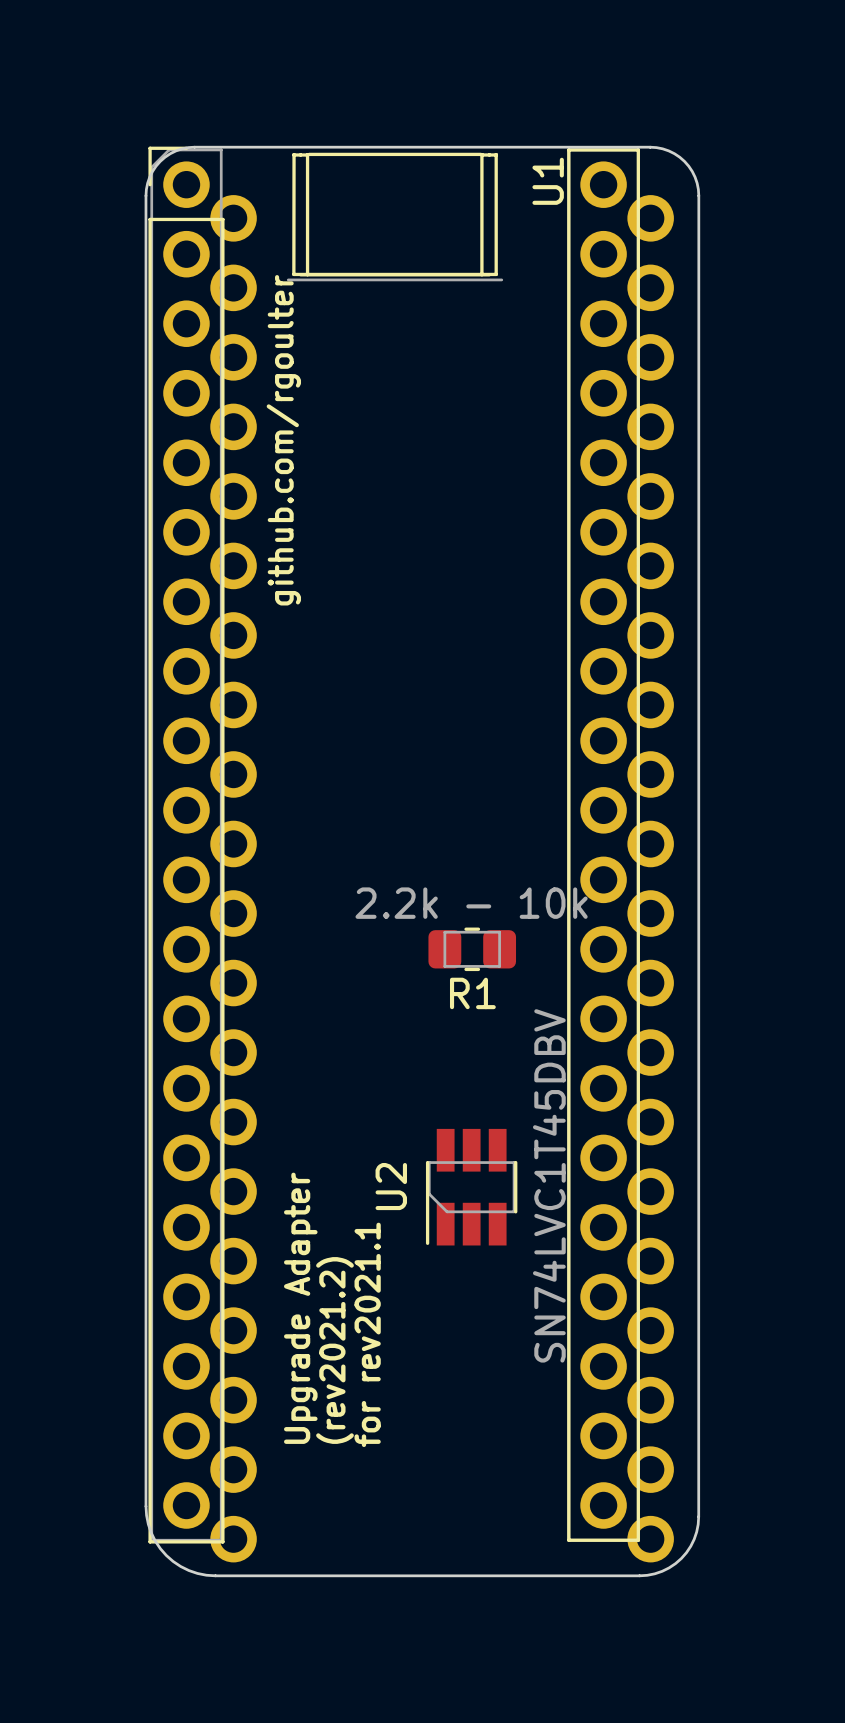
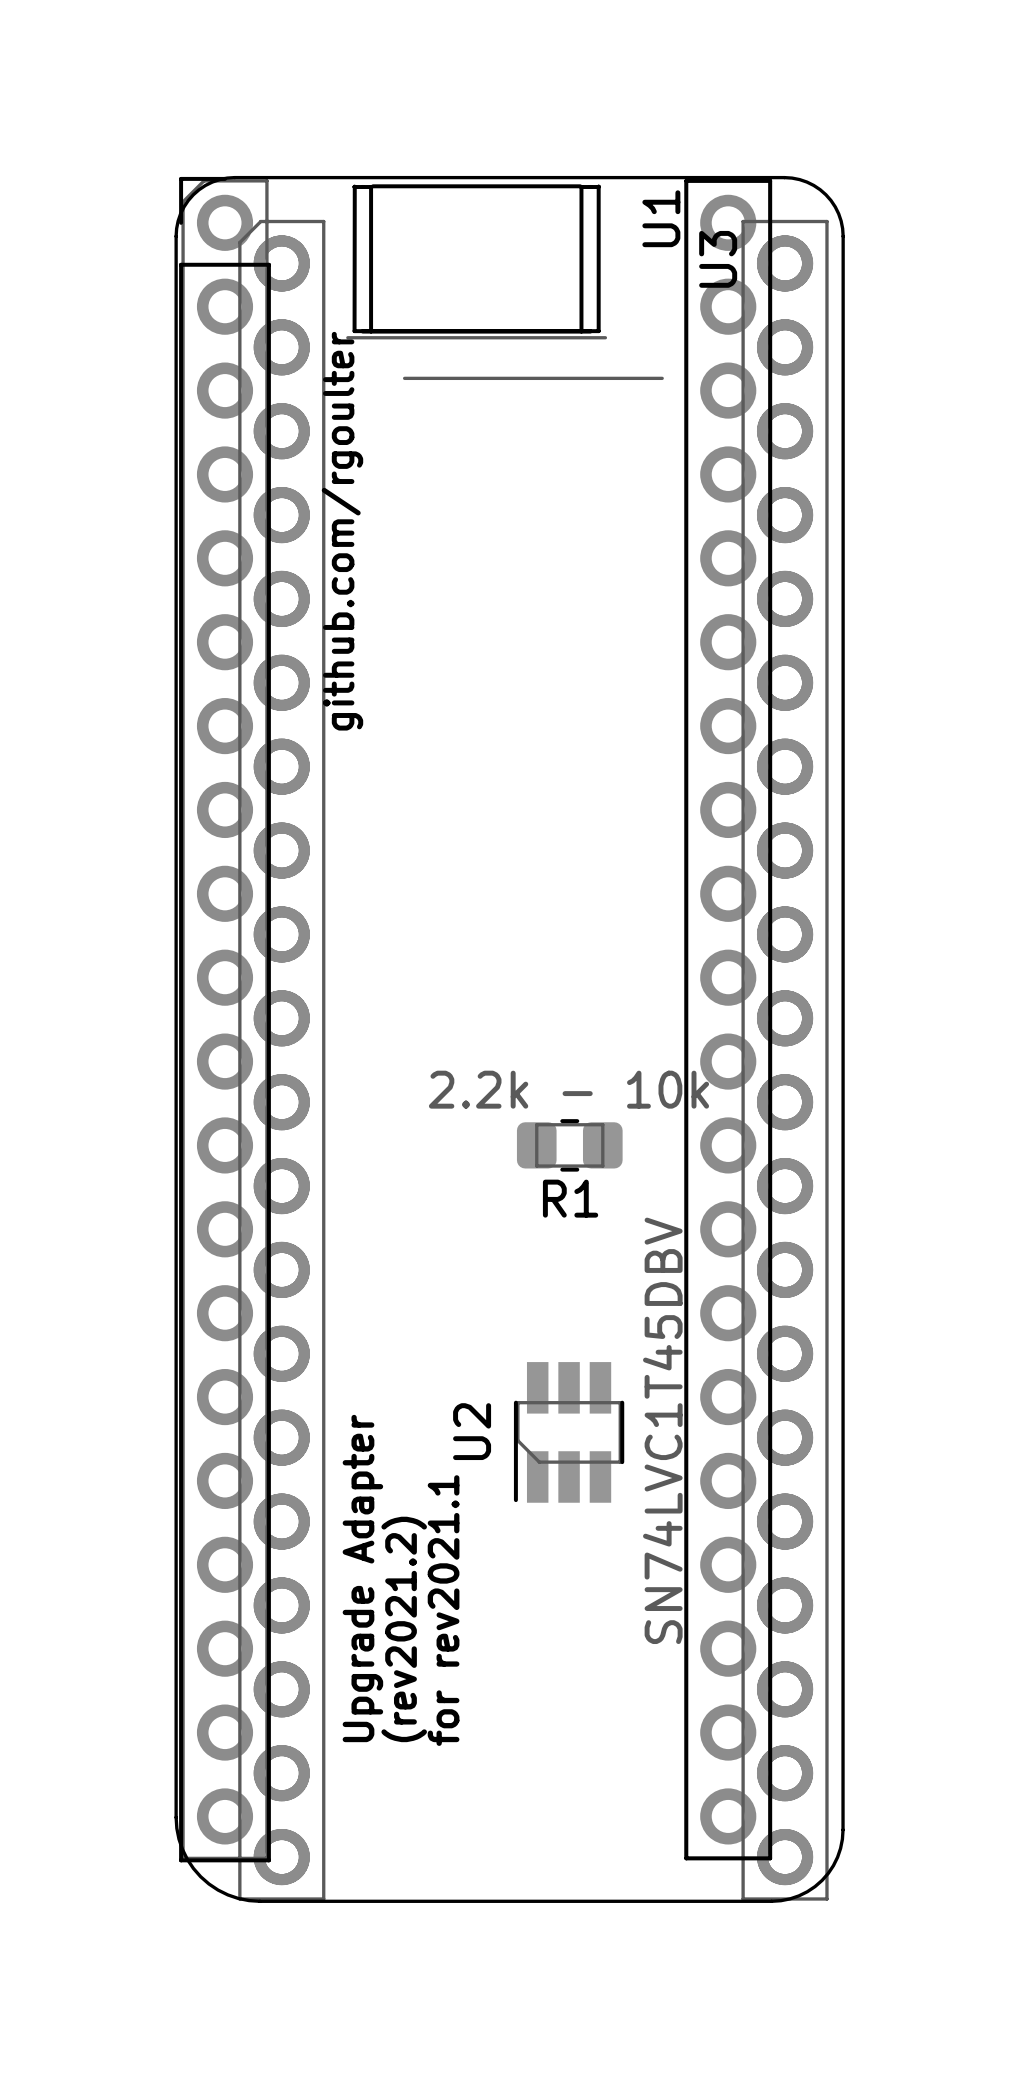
U3: none -> (533, 1060)

